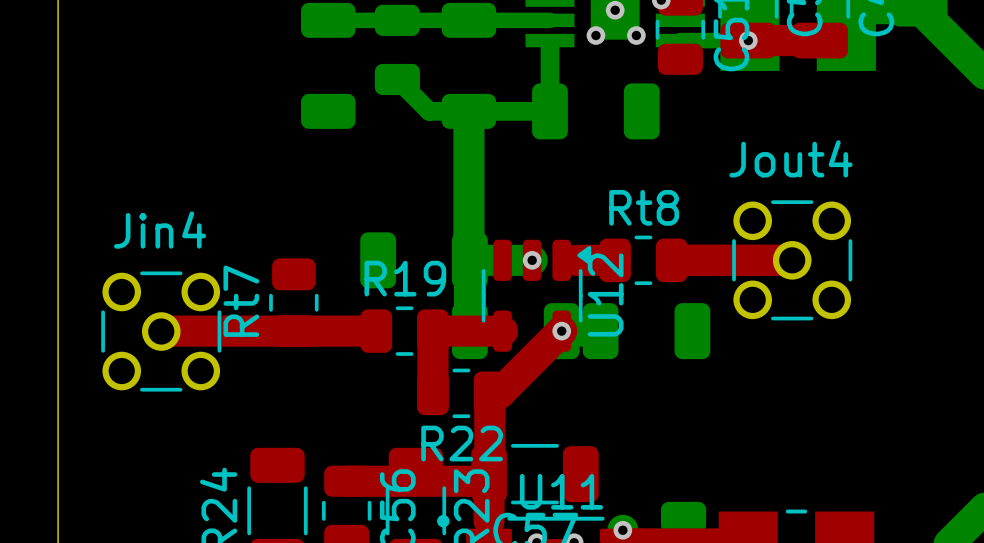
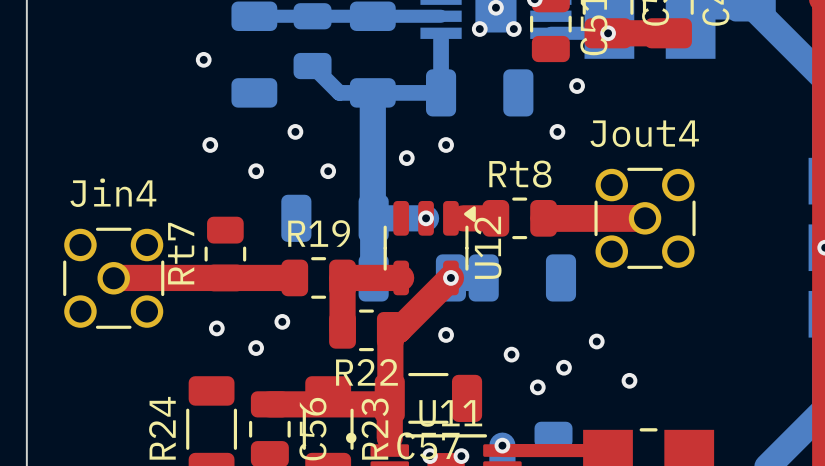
via: none -> (203, 59)
via: none -> (577, 86)
via: none -> (295, 131)
via: none -> (557, 131)
via: none -> (210, 145)
via: none -> (446, 145)
via: none -> (406, 158)
via: none -> (256, 171)
via: none -> (328, 171)
via: none -> (282, 321)
via: none -> (216, 328)
via: none -> (446, 334)
via: none -> (596, 341)
via: none -> (256, 348)
via: none -> (511, 354)
via: none -> (563, 367)
via: none -> (629, 380)
via: none -> (537, 387)

